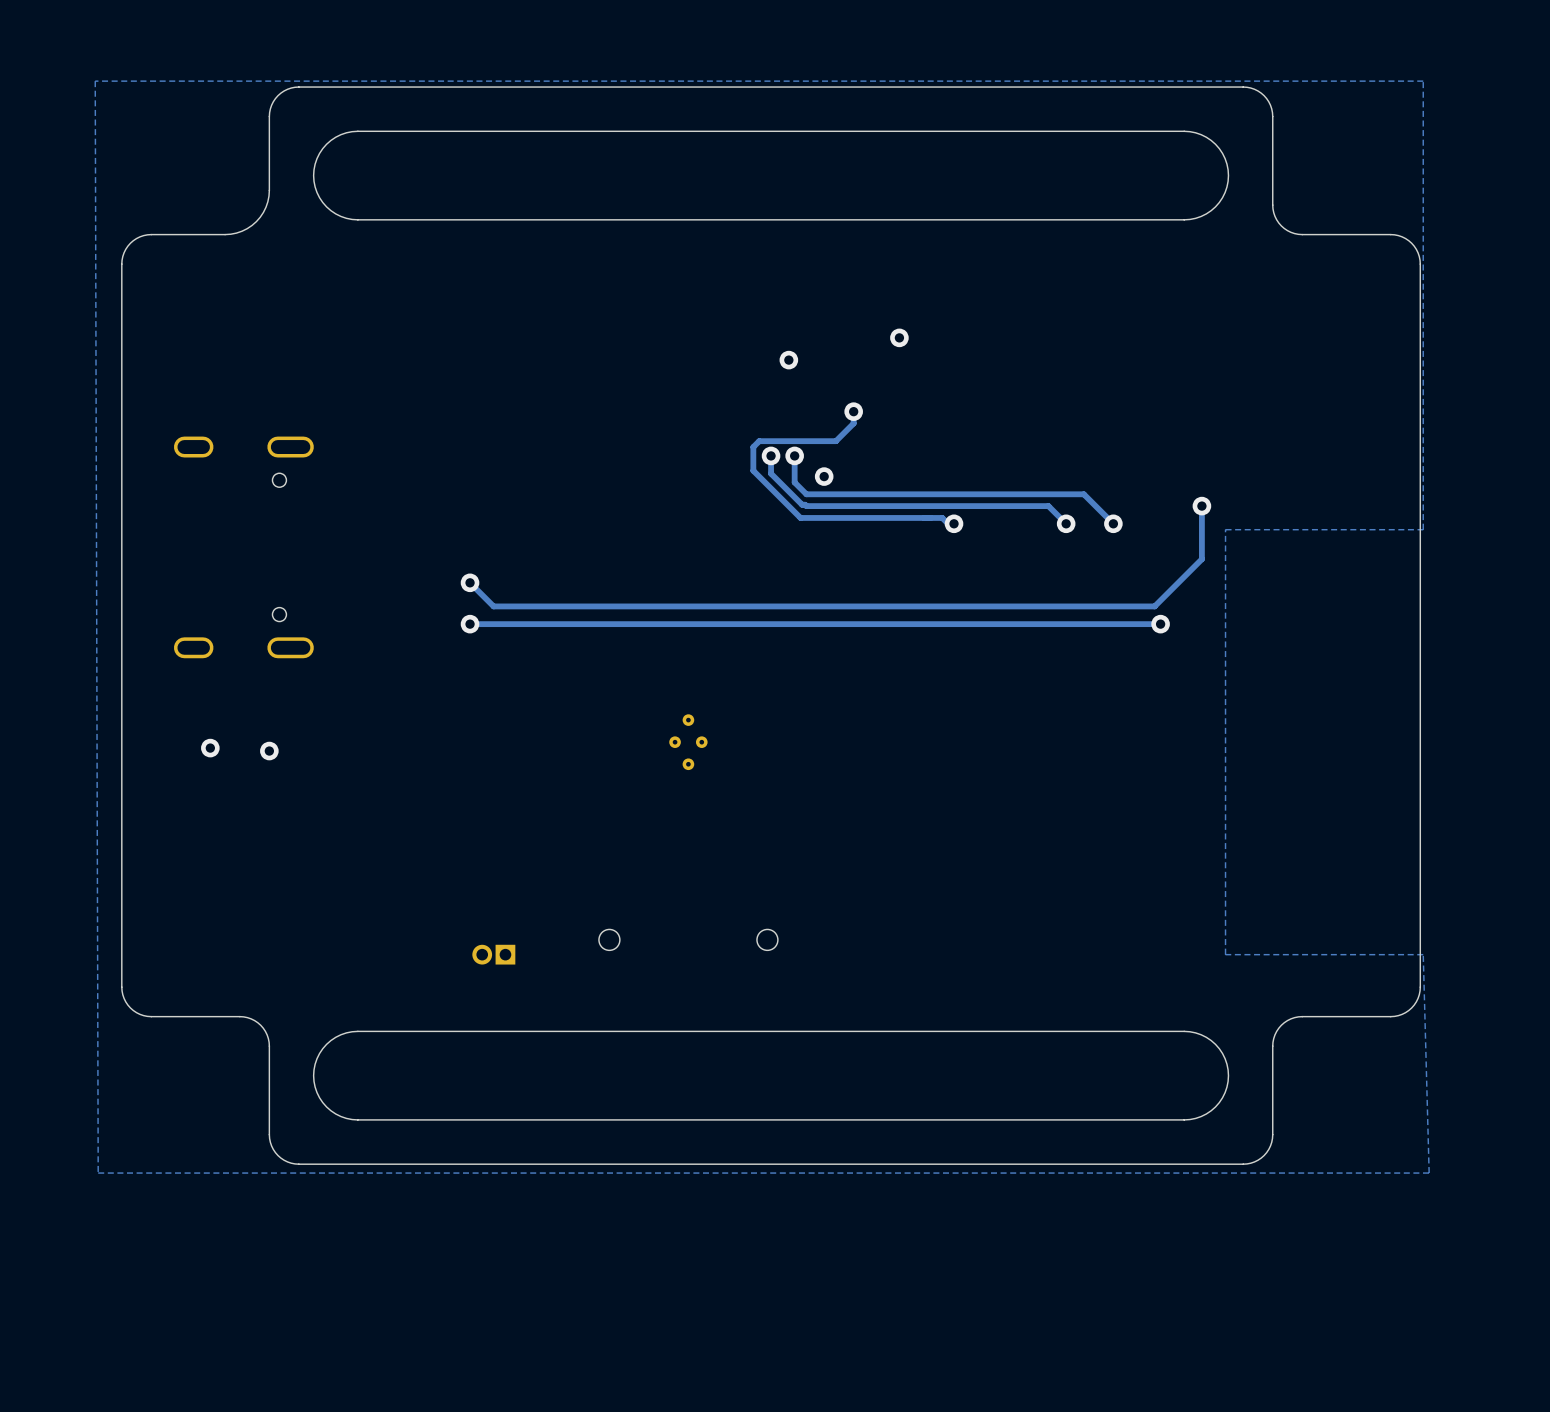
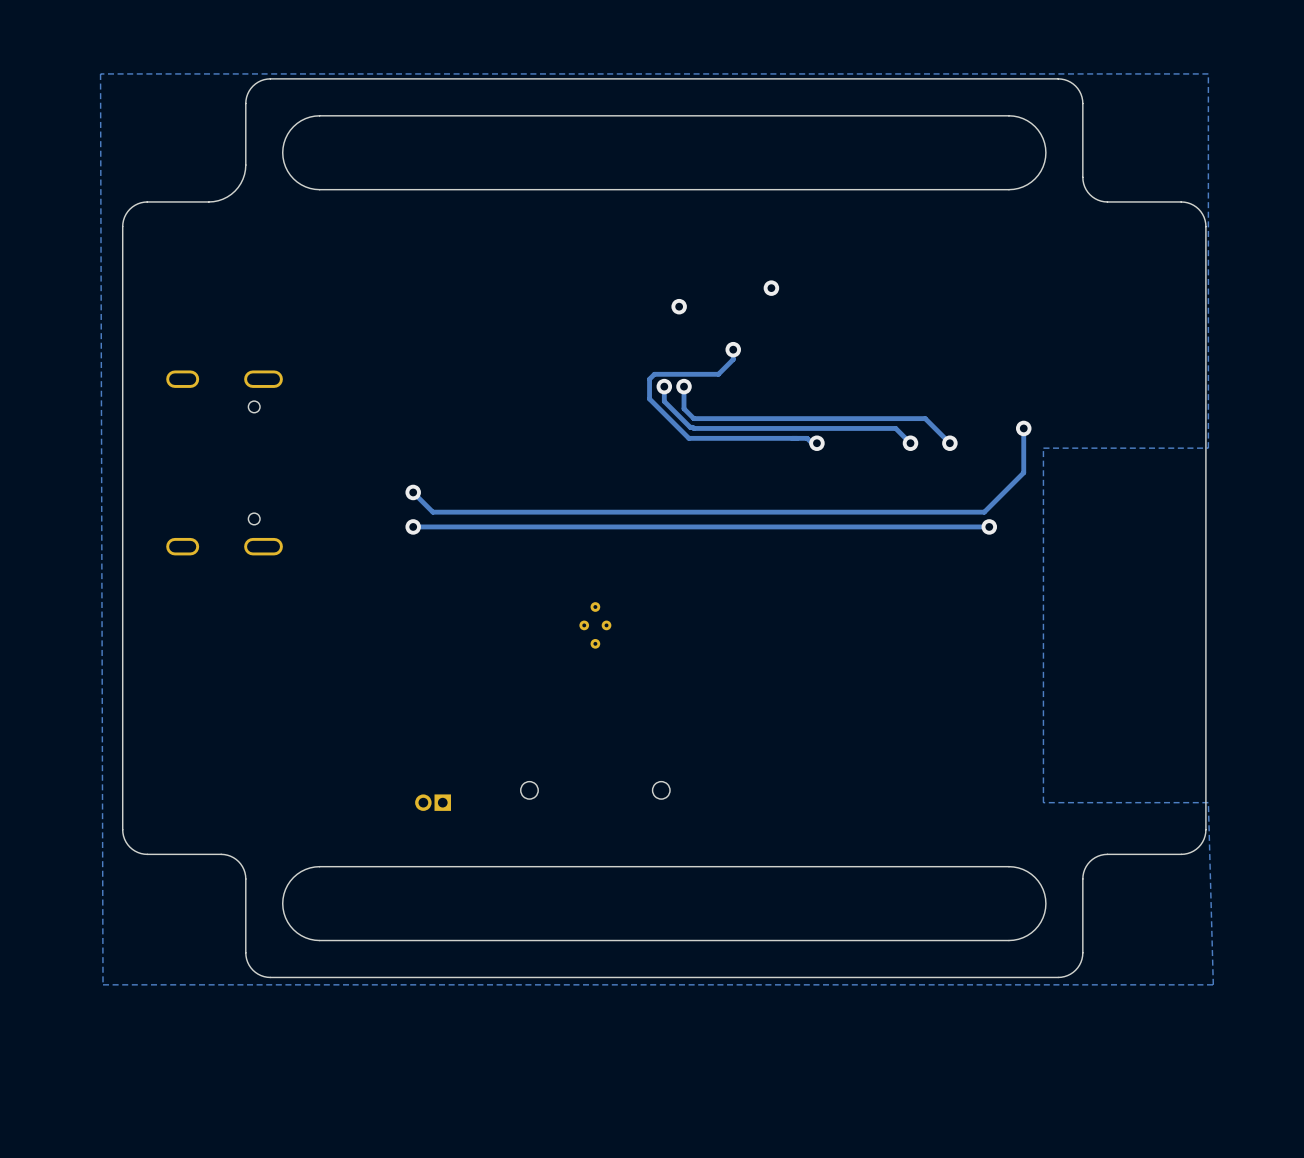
via: (824, 476) -> none
via: (210, 748) -> none
via: (269, 751) -> none

